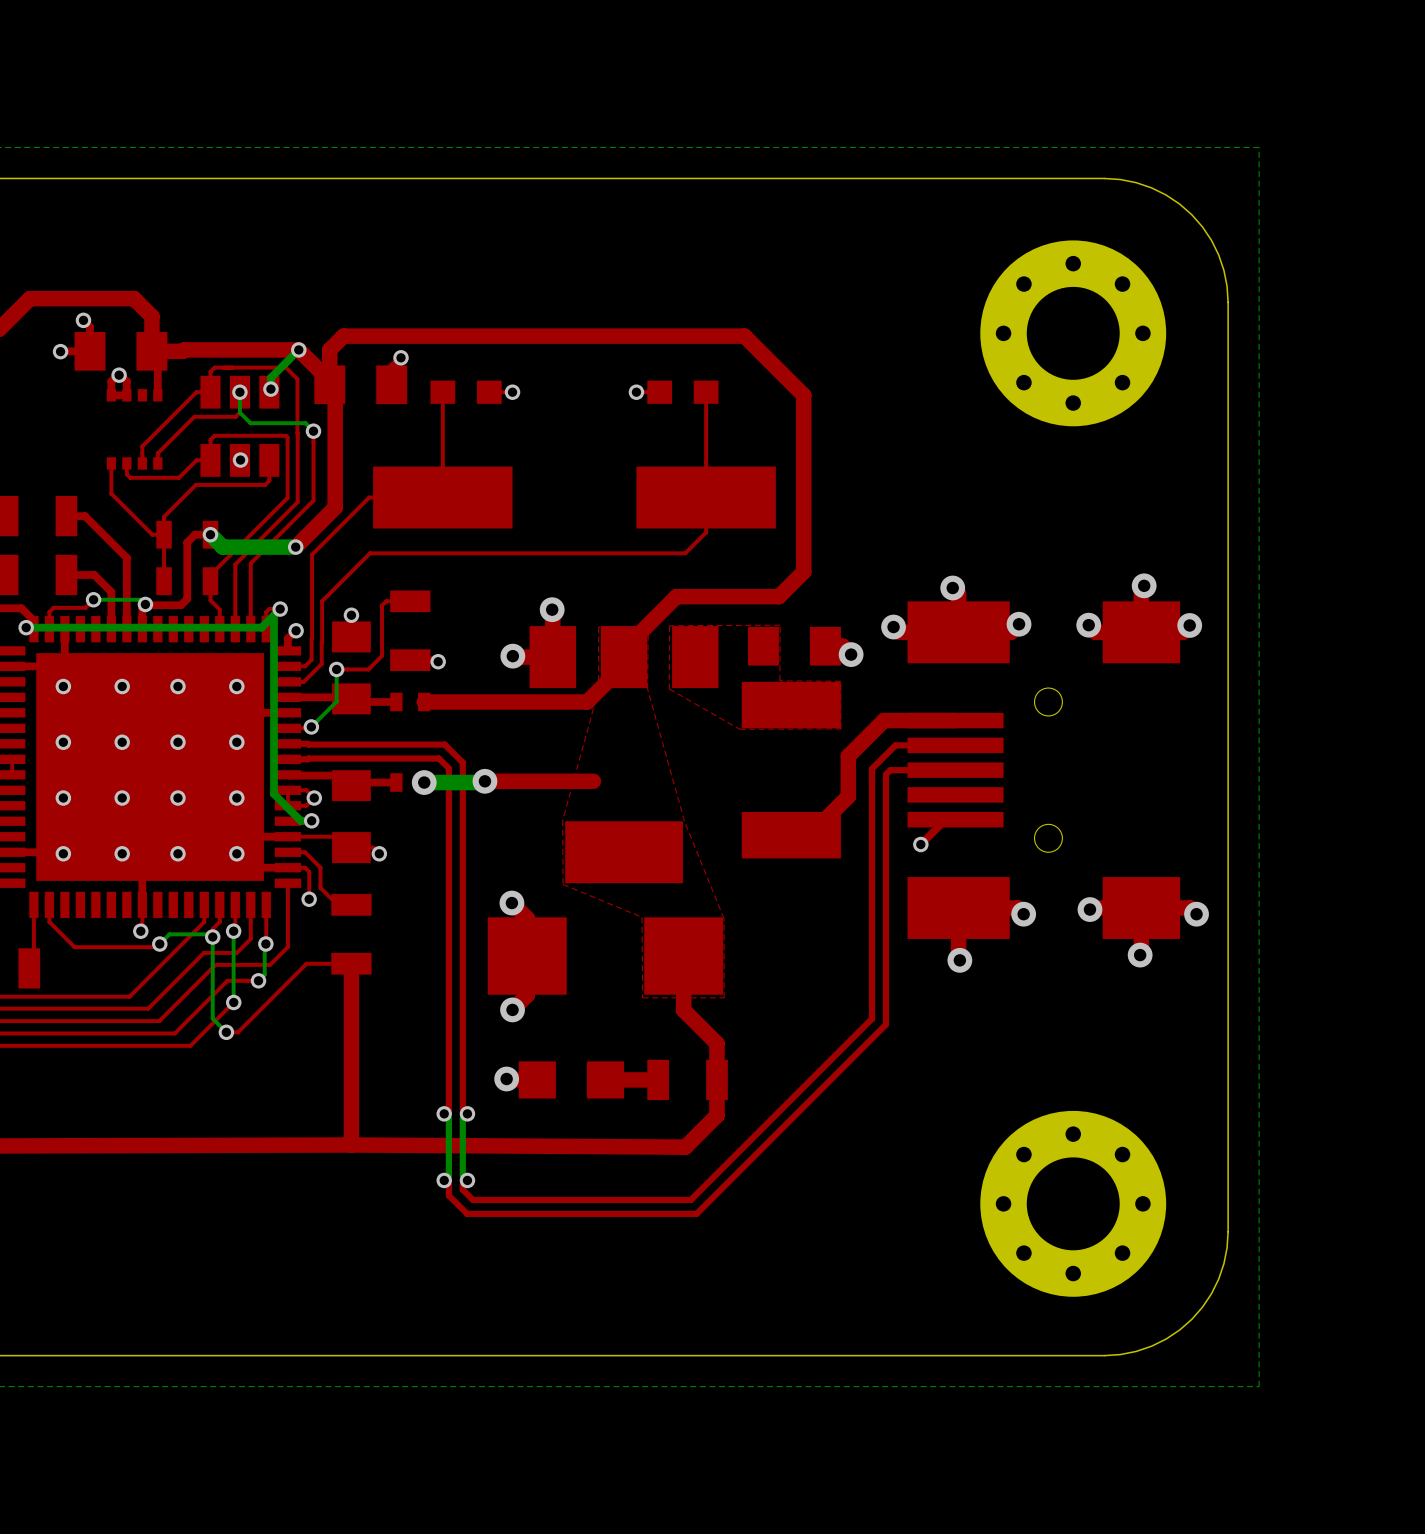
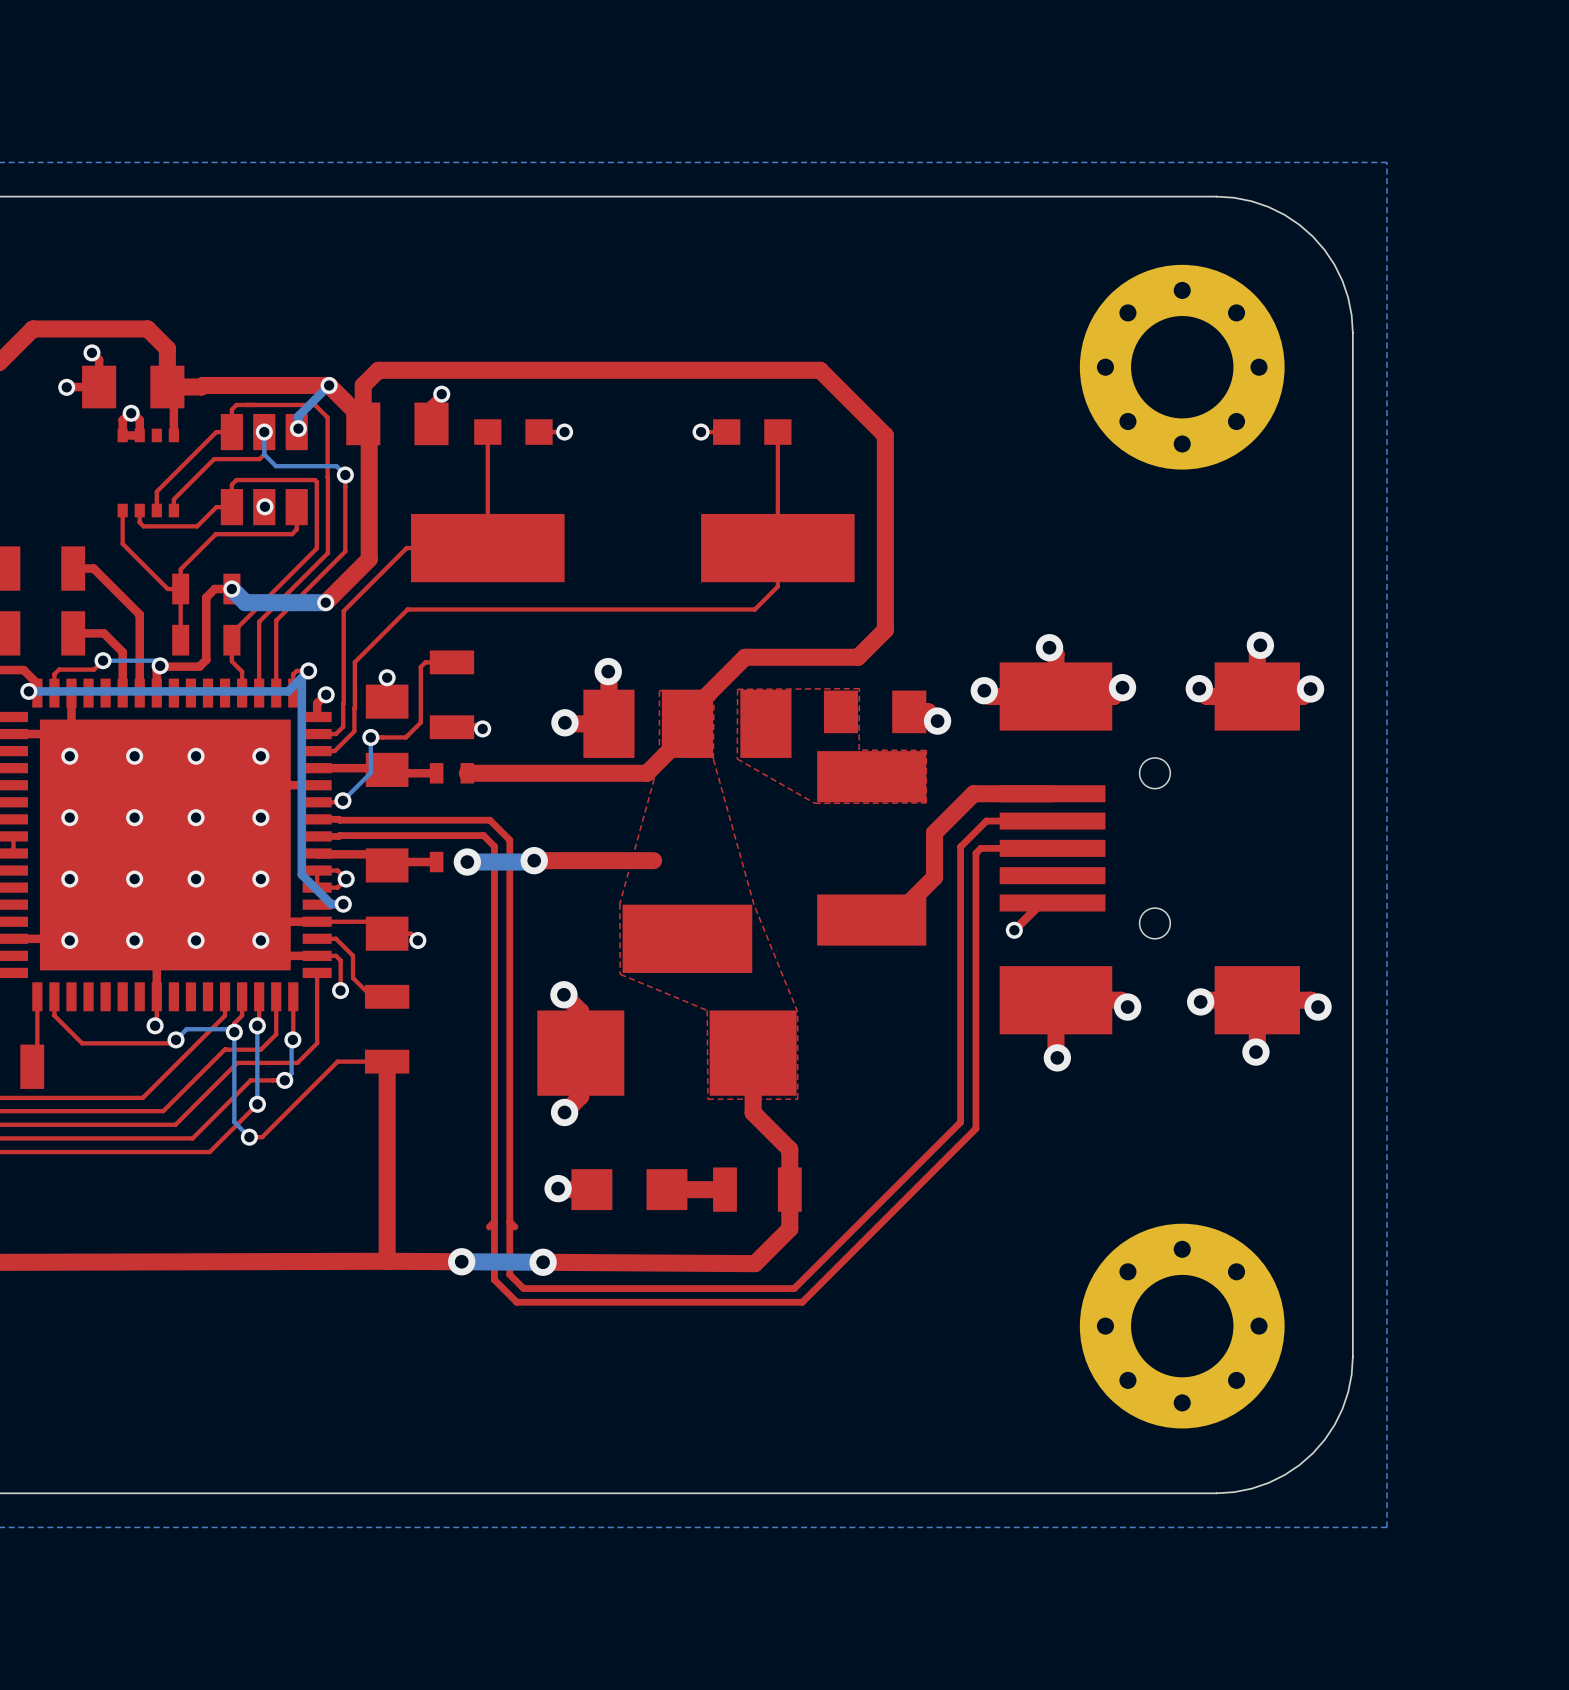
bottom track: (444, 1113) (448, 1118) (448, 1175) (444, 1180) -> none
via: (444, 1113) -> none
bottom track: (467, 1113) (462, 1118) (462, 1175) (467, 1180) -> none
via: (467, 1113) -> none
top track: (419, 1145) (493, 1145) -> none
bottom track: none -> (461, 1261) (543, 1262)
via: none -> (461, 1261)
via: none -> (543, 1262)
top track: (721, 1169) (690, 1199) (472, 1199) (462, 1189) (462, 1185) (467, 1180) -> (794, 1288) (523, 1288) (509, 1274) (509, 1221)
top track: (444, 1180) (448, 1185) (448, 1195) (467, 1213) (696, 1213) (728, 1182) -> (494, 1221) (494, 1279) (516, 1302) (802, 1302)
via: (444, 1180) -> none
via: (467, 1180) -> none

